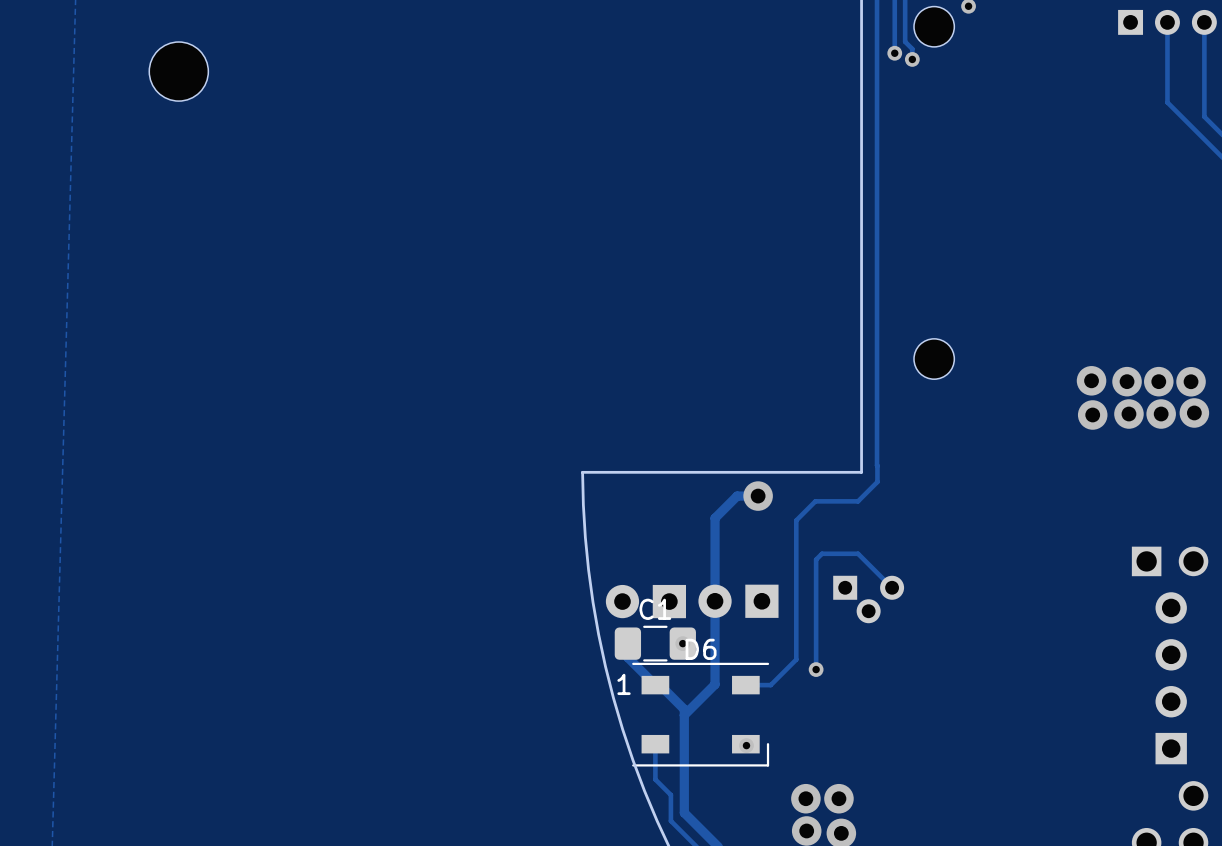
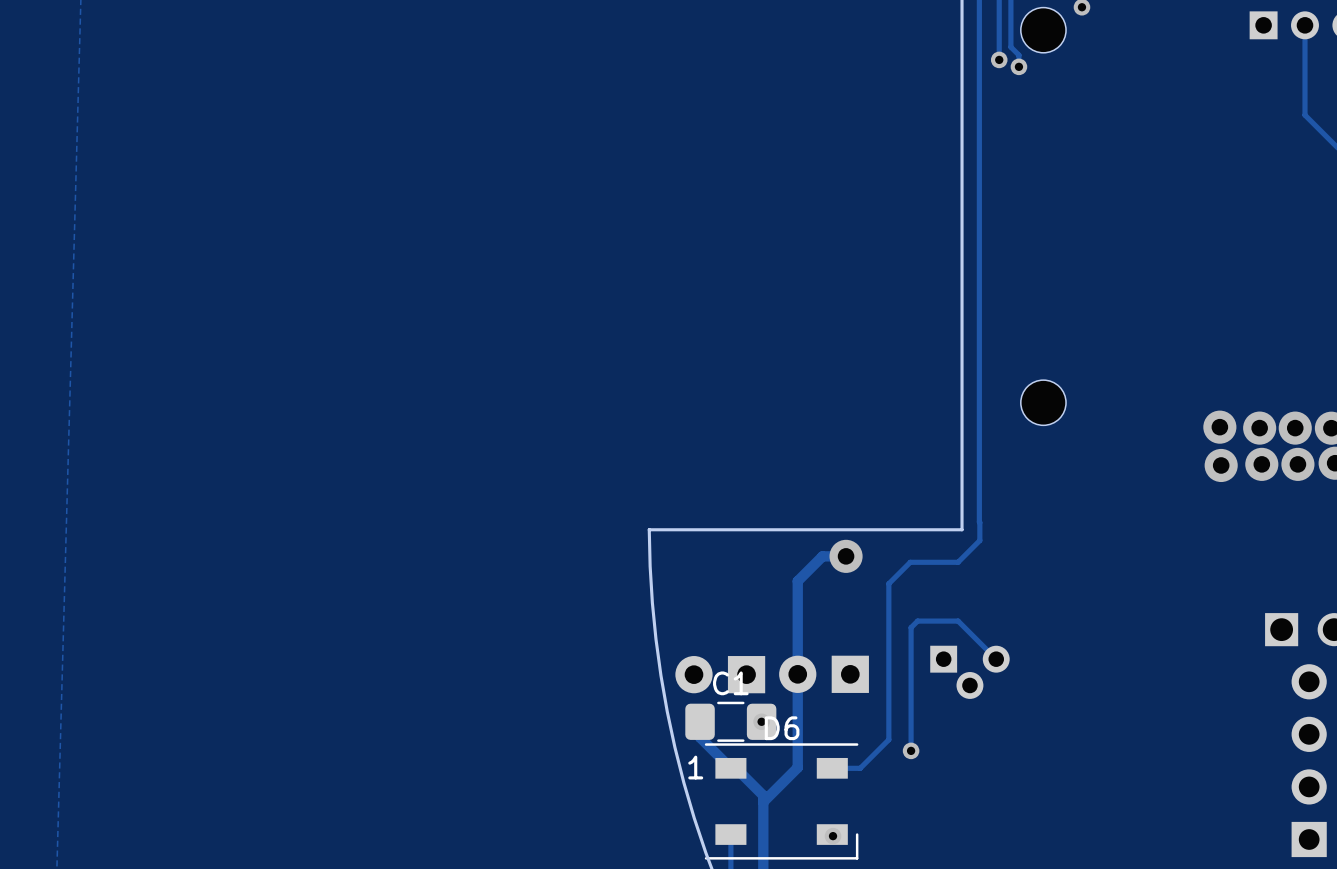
part: (178, 71) -> none

